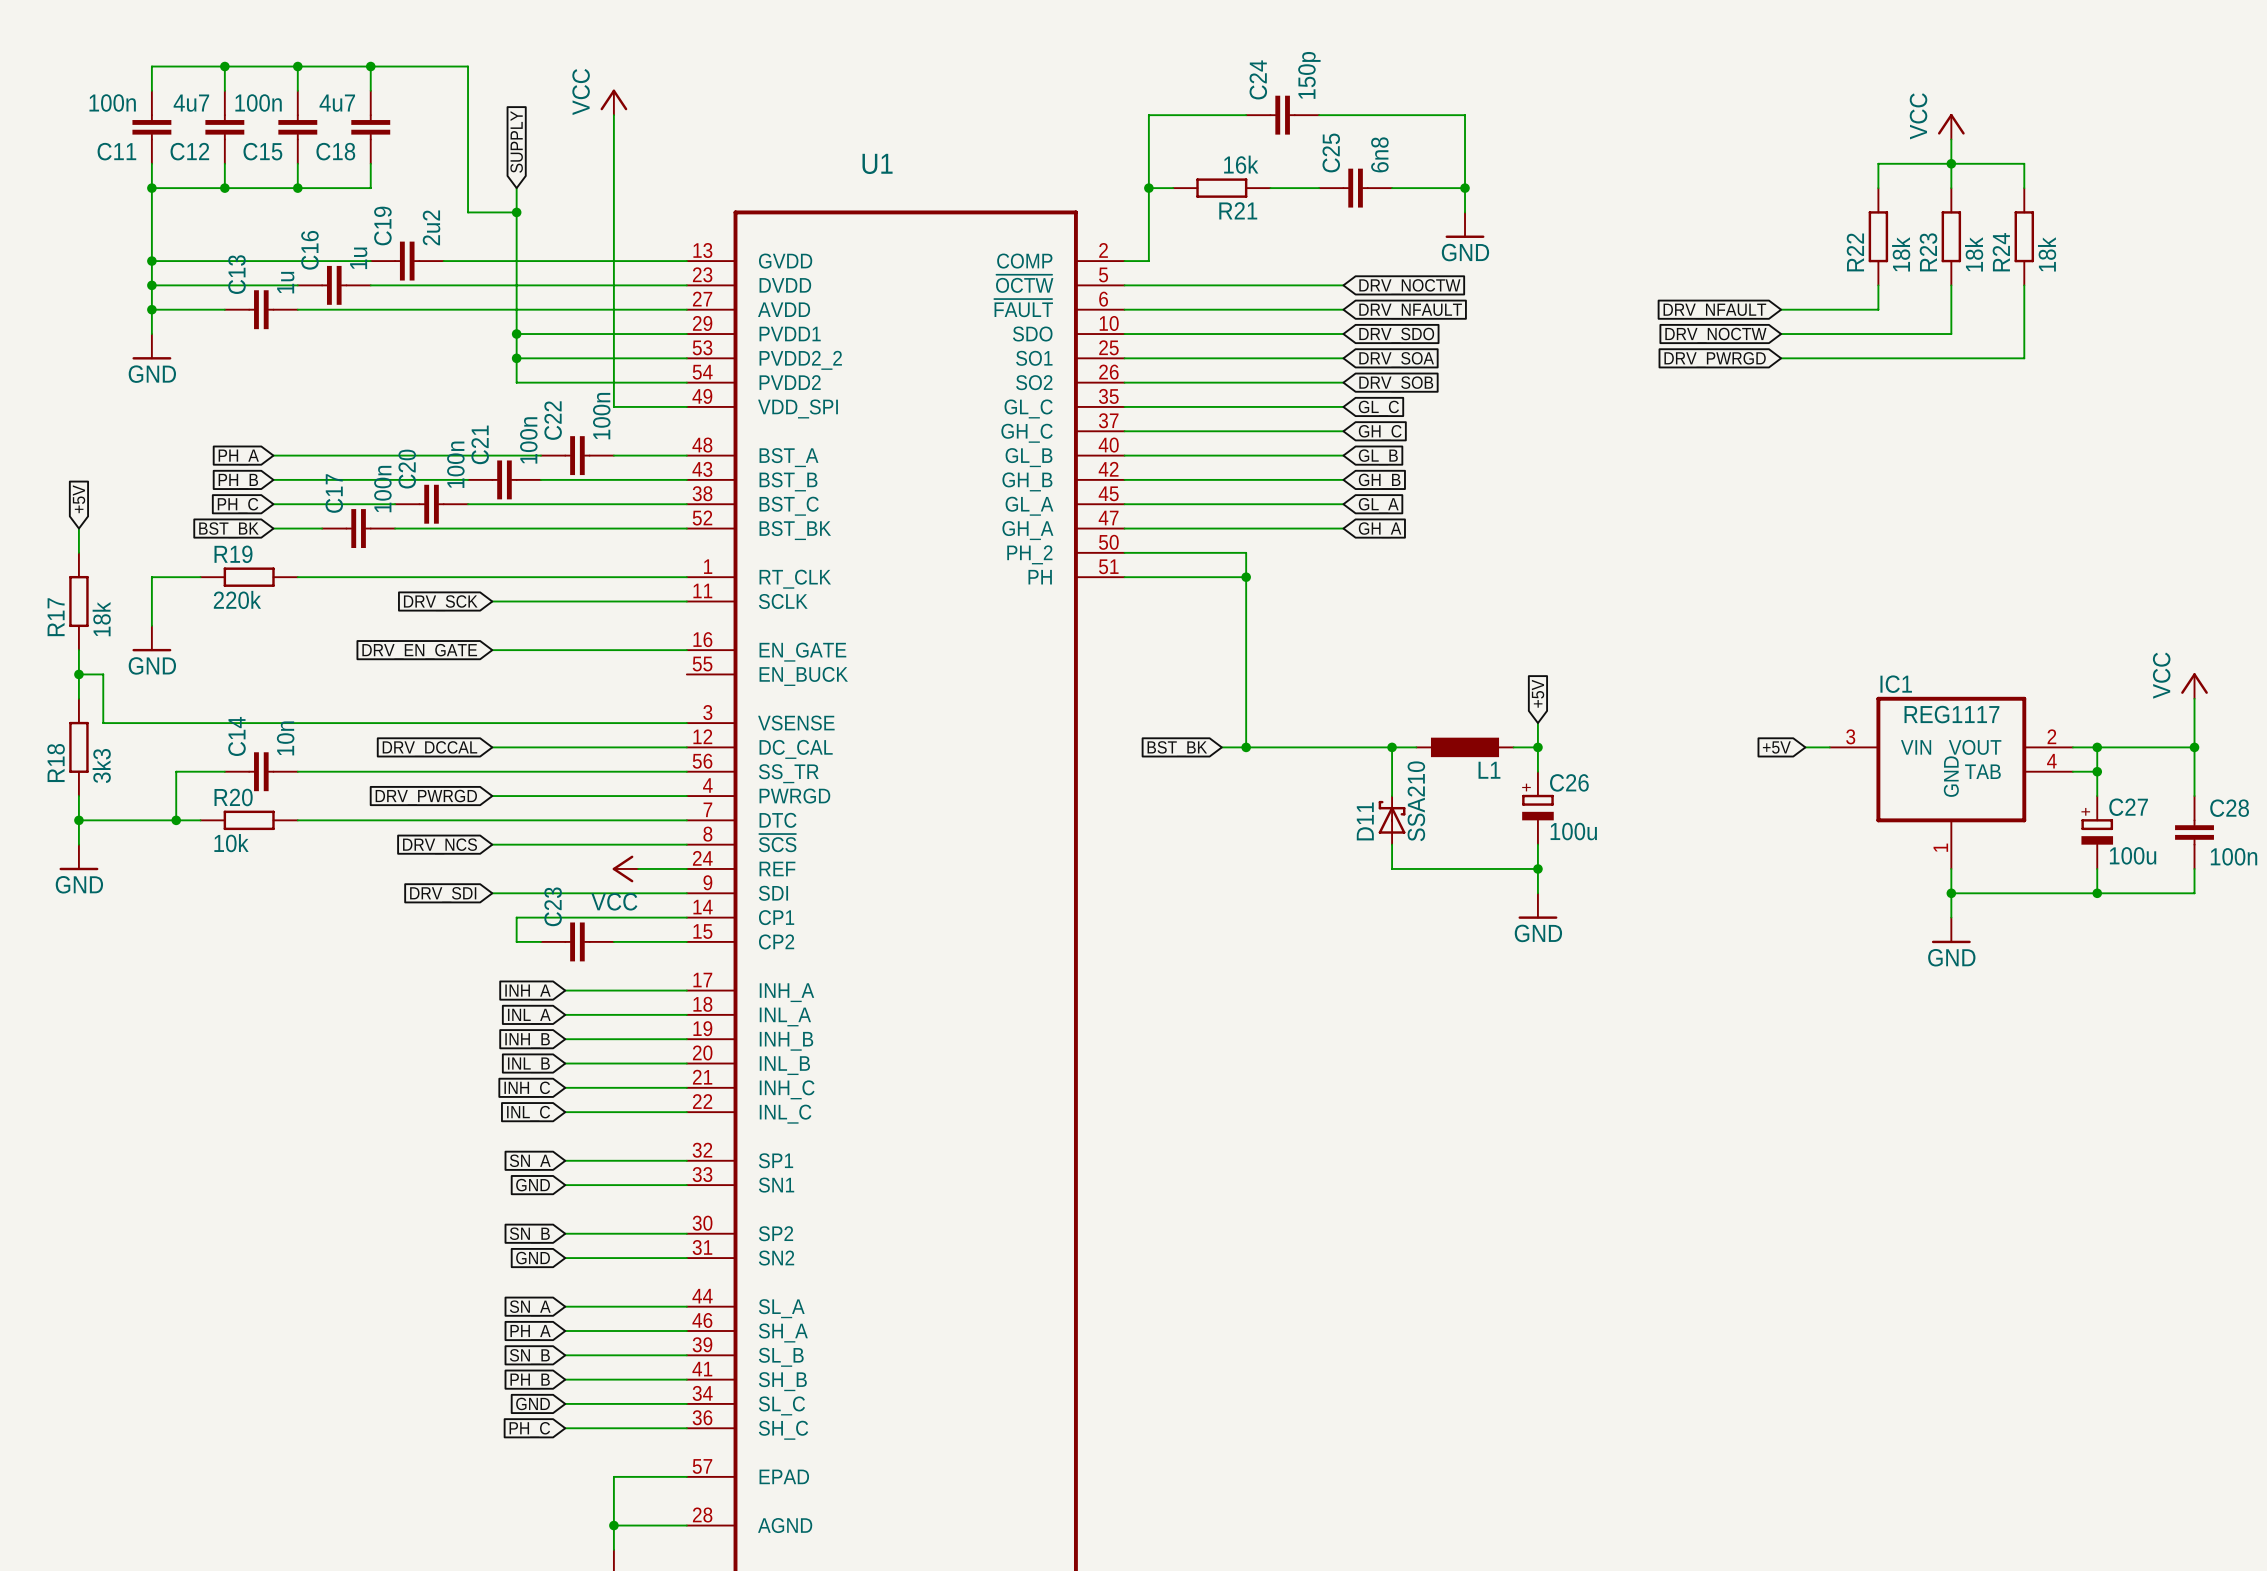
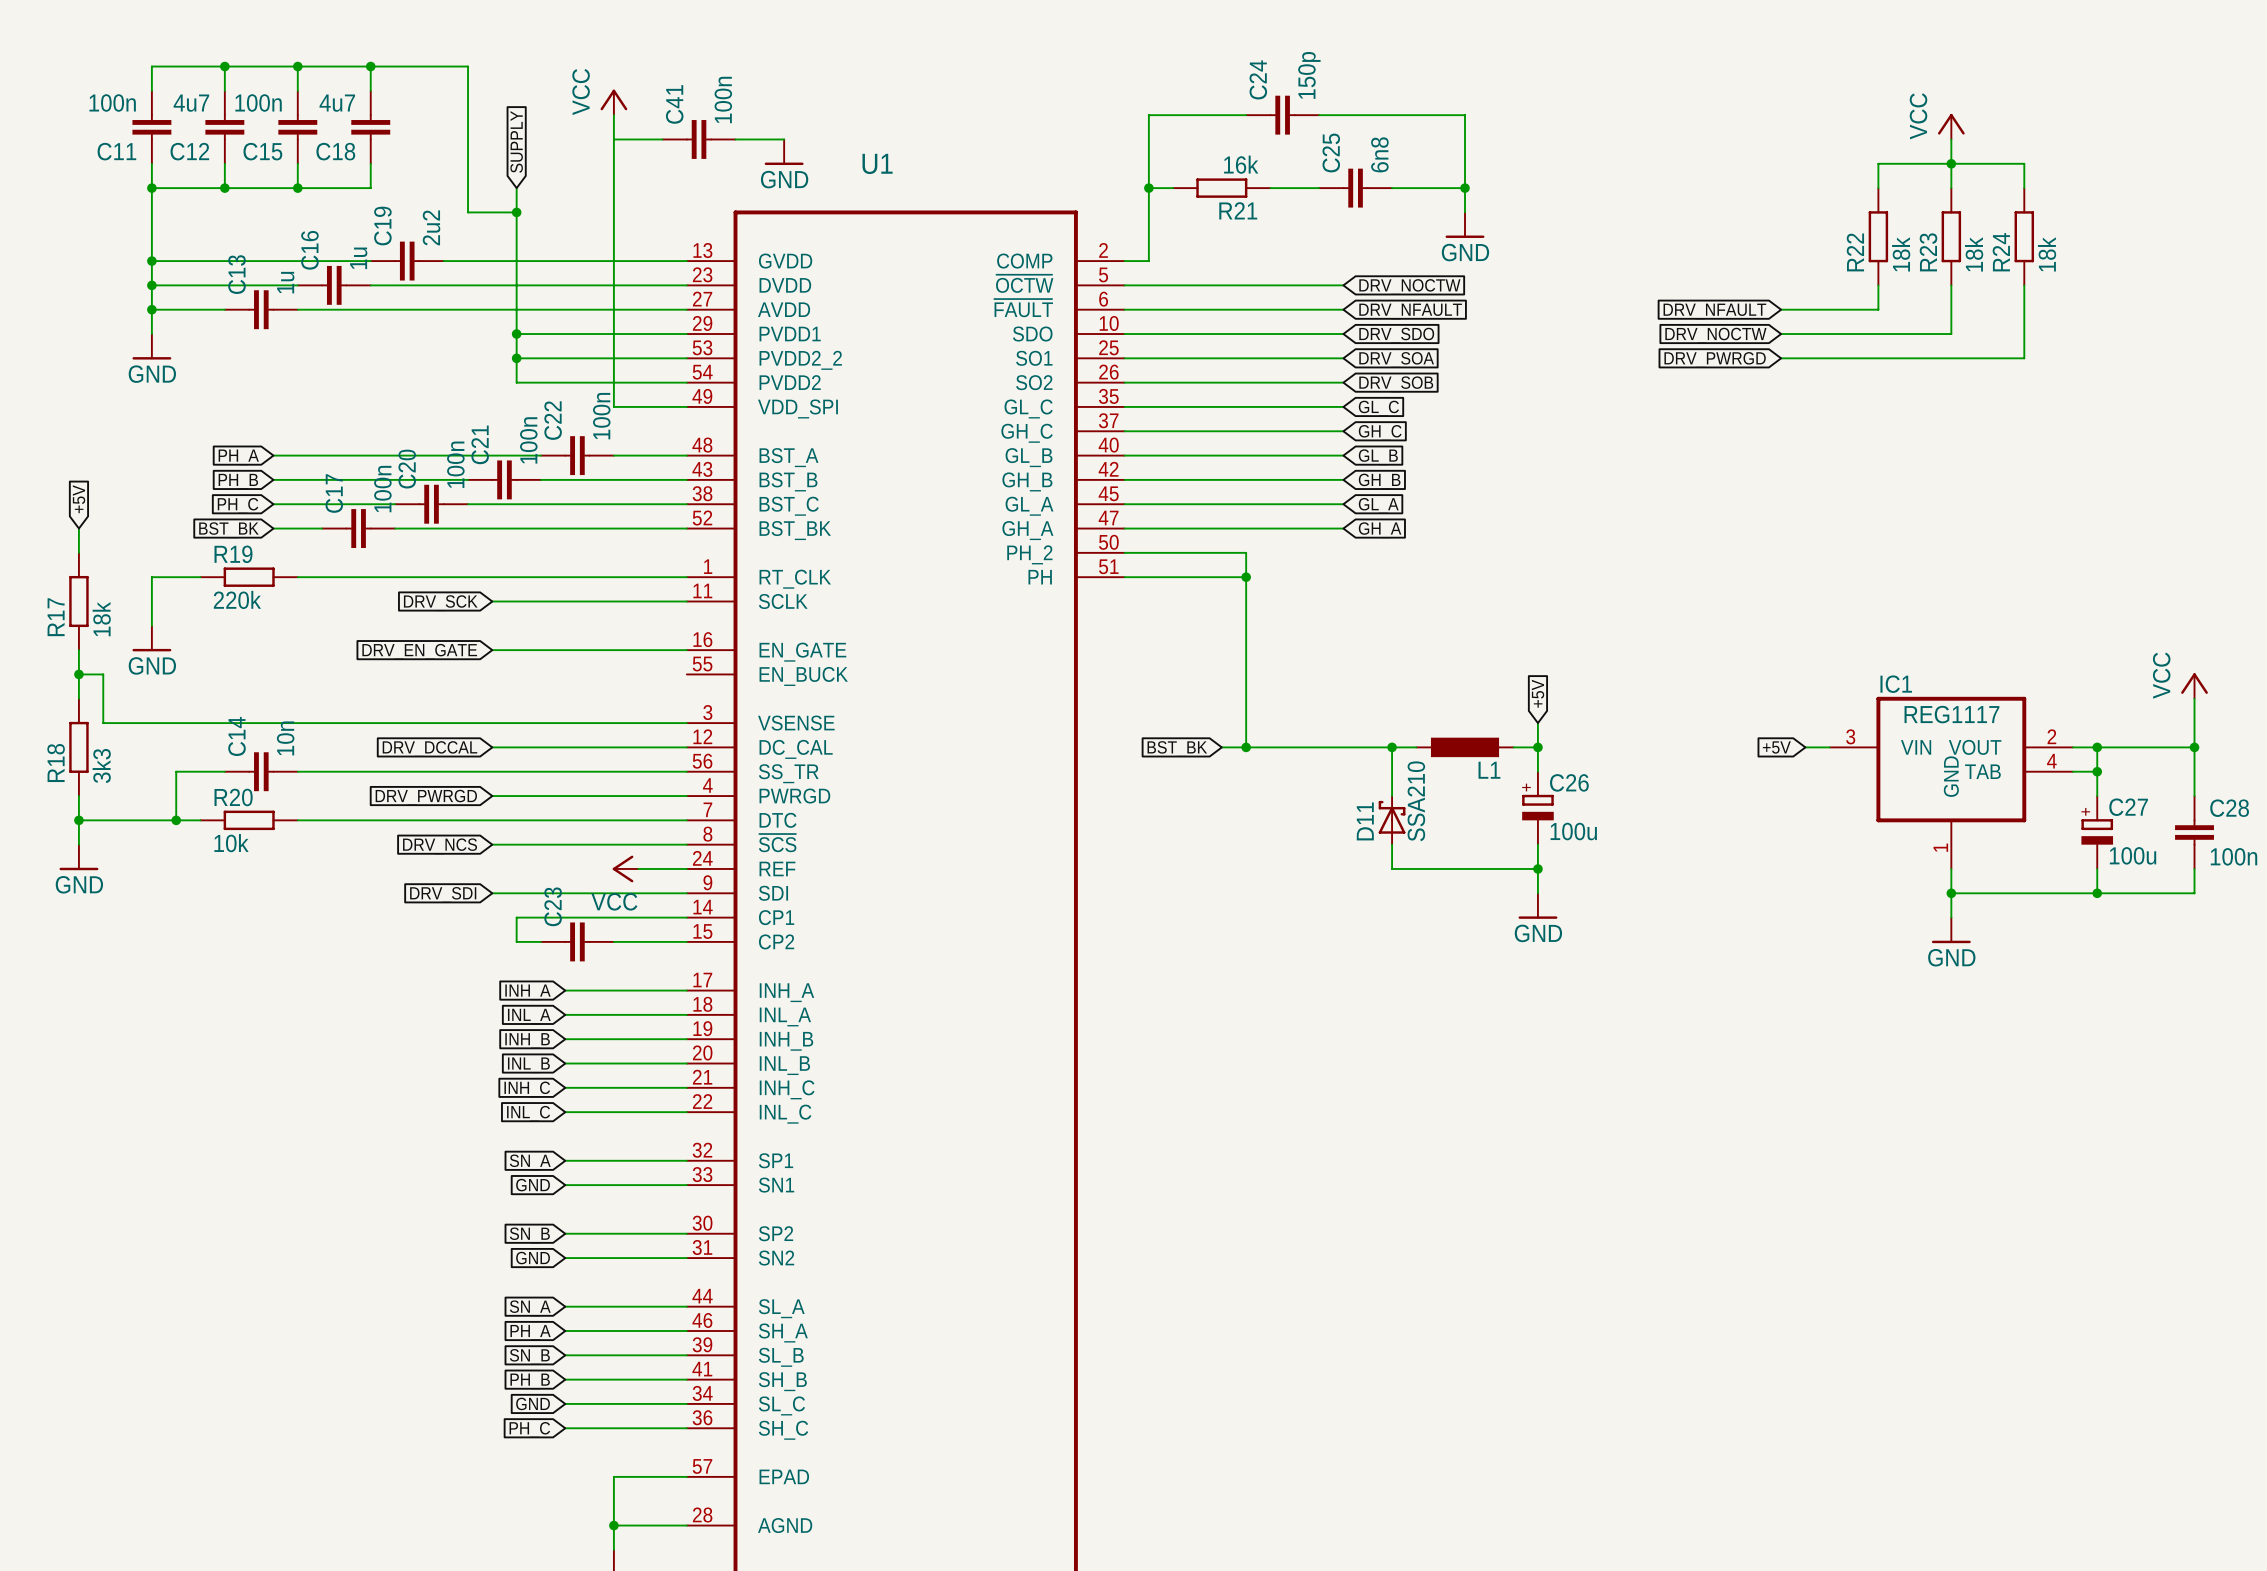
wire: none -> (613, 139) (662, 139)
C41: none -> 100n (699, 139)
wire: none -> (735, 139) (784, 139)
power symbol: none -> GND (784, 152)

